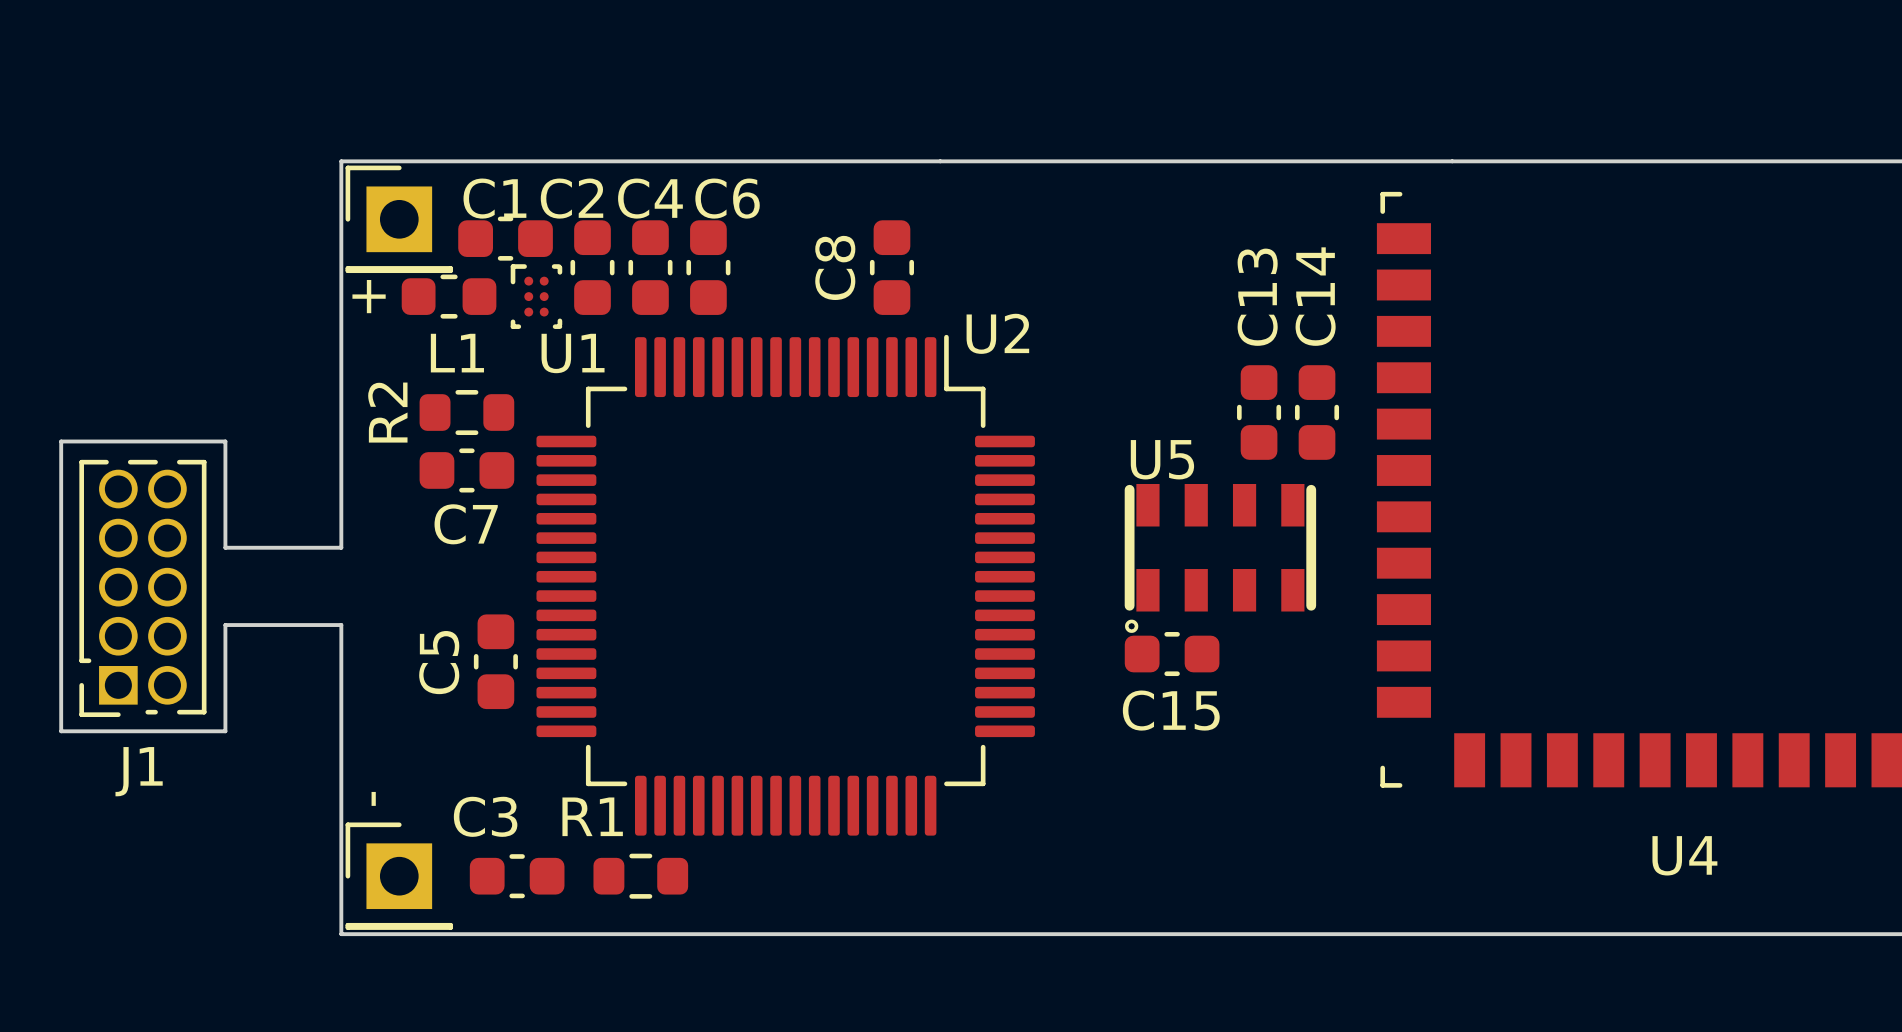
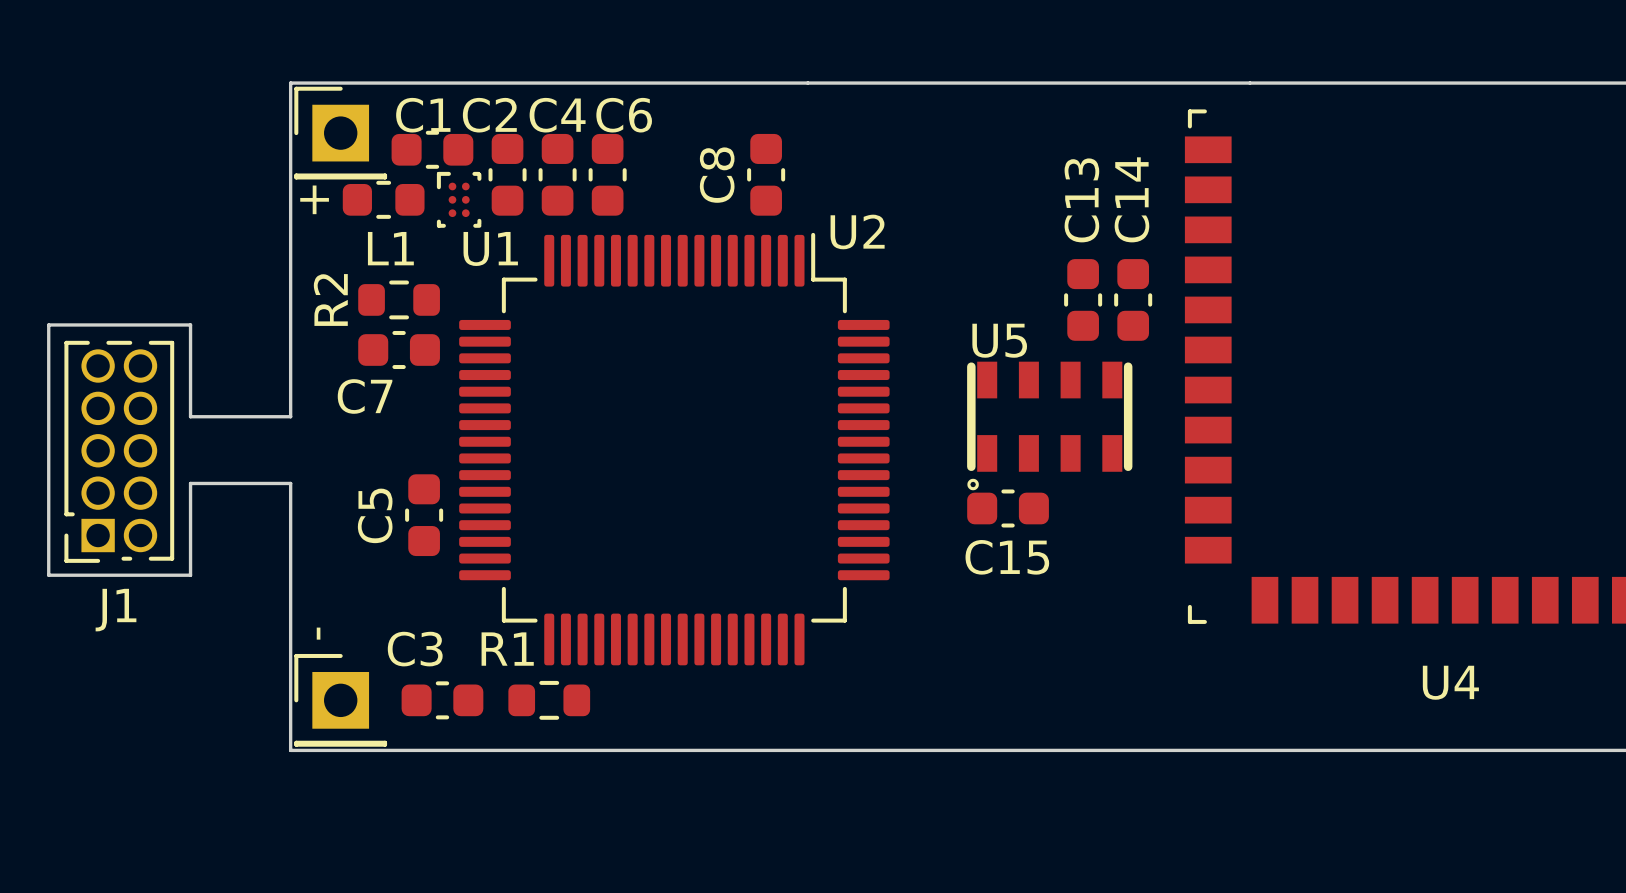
C7 name position: C7 (466, 524) -> C7 (365, 396)

